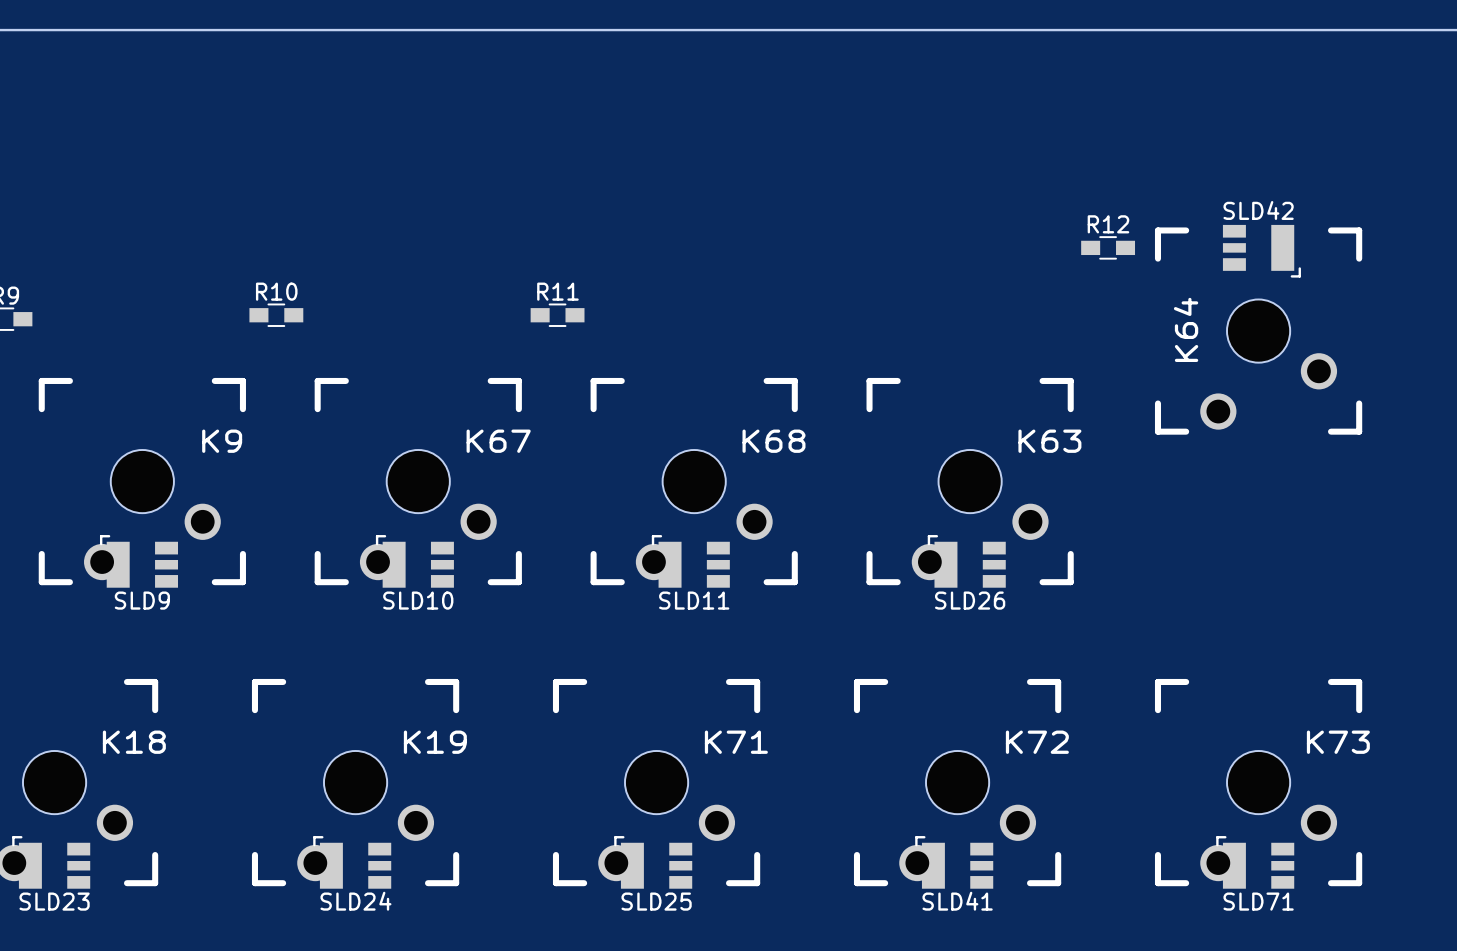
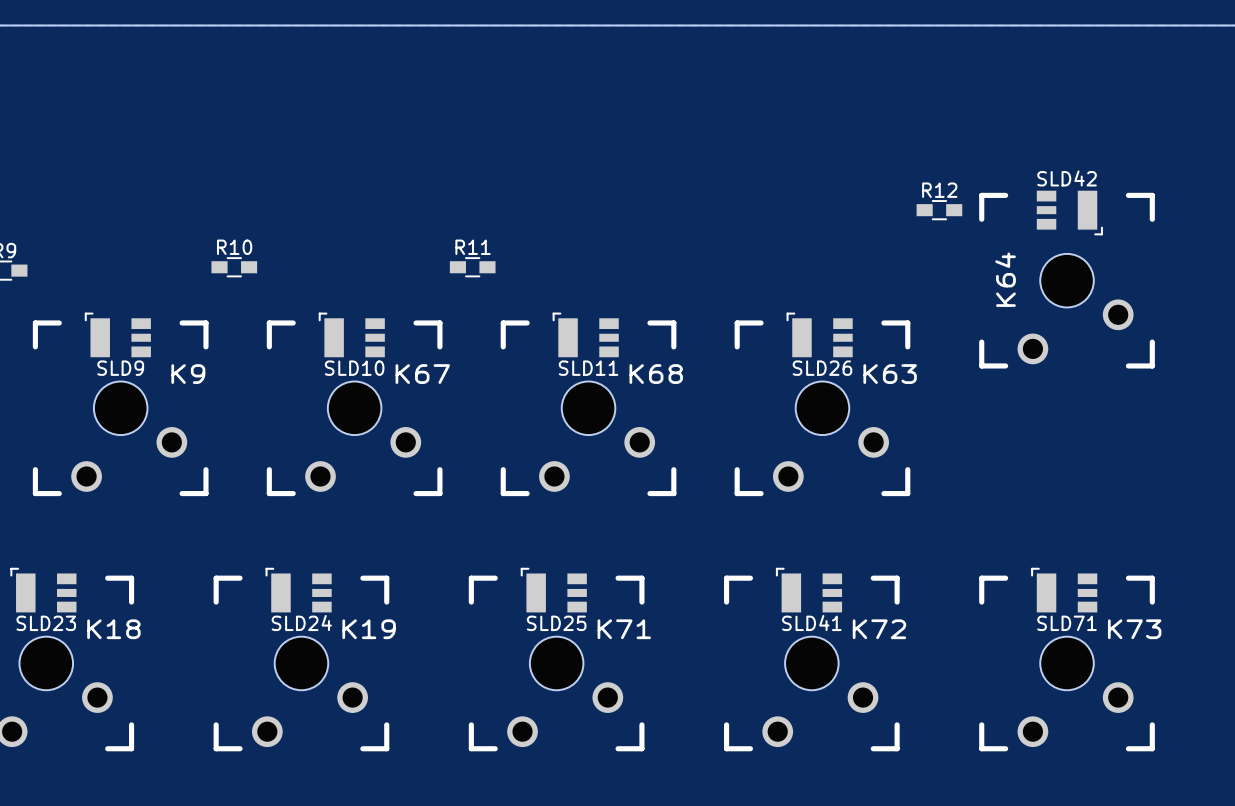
SLD9 position: (138, 561) -> (117, 334)
SLD10 position: (414, 561) -> (351, 334)
SLD11 position: (690, 561) -> (585, 334)
SLD26 position: (966, 561) -> (819, 334)
SLD23 position: (51, 862) -> (43, 590)
SLD24 position: (352, 862) -> (298, 590)
SLD25 position: (653, 862) -> (553, 590)
SLD41 position: (954, 862) -> (808, 590)
SLD71 position: (1255, 862) -> (1064, 590)

